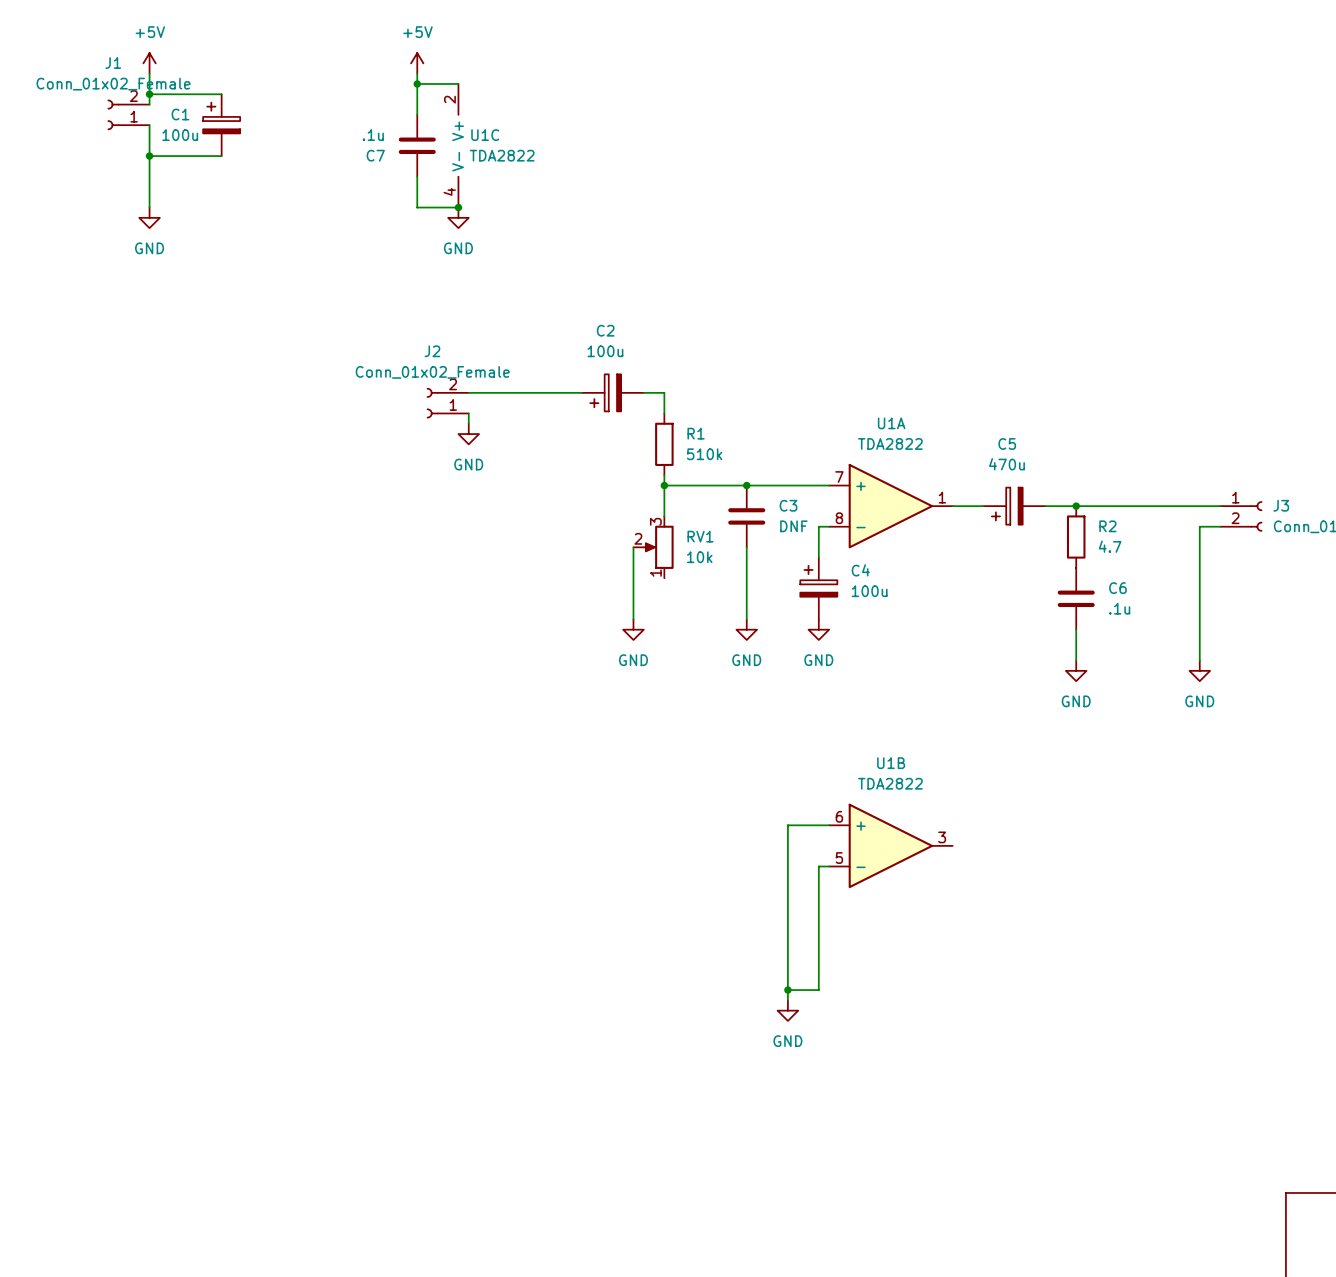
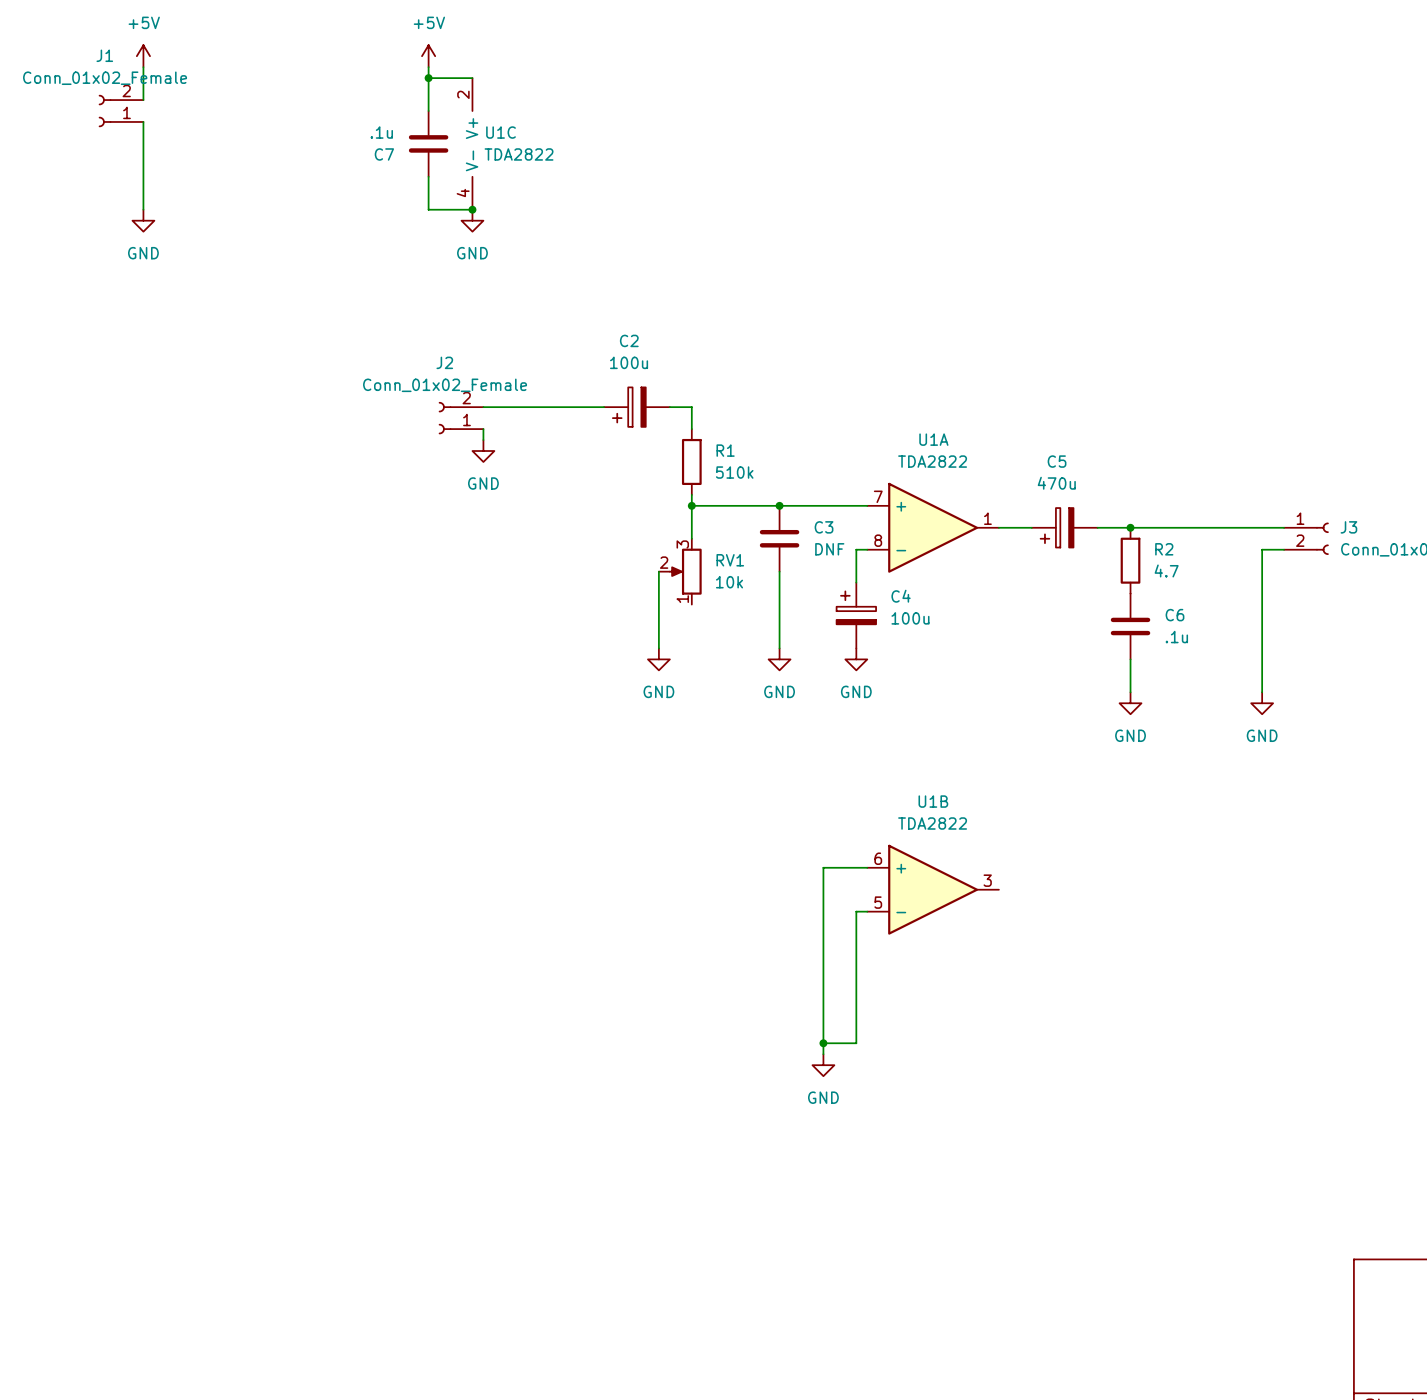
wire: (149, 94) (221, 94) -> none
junction: (149, 94) -> none
C1: 100u (221, 125) -> none
wire: (149, 156) (221, 156) -> none
junction: (149, 156) -> none

